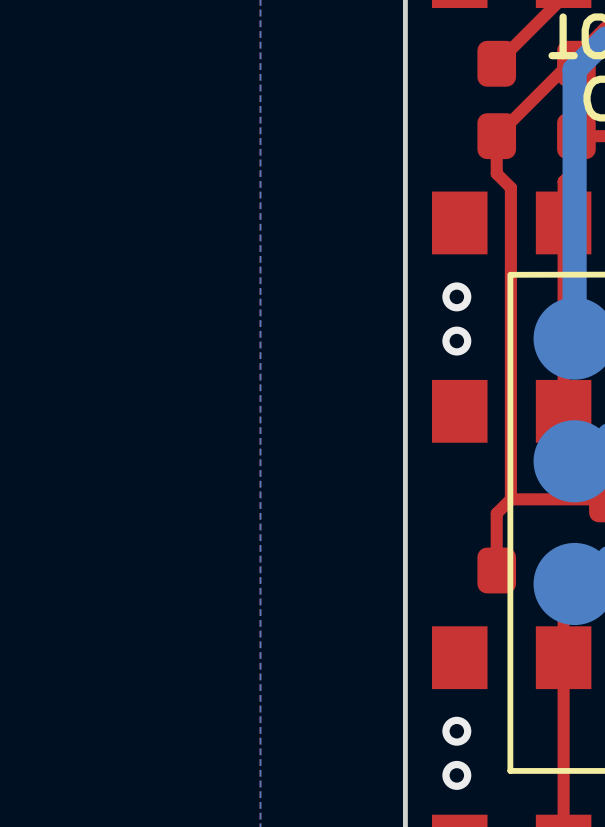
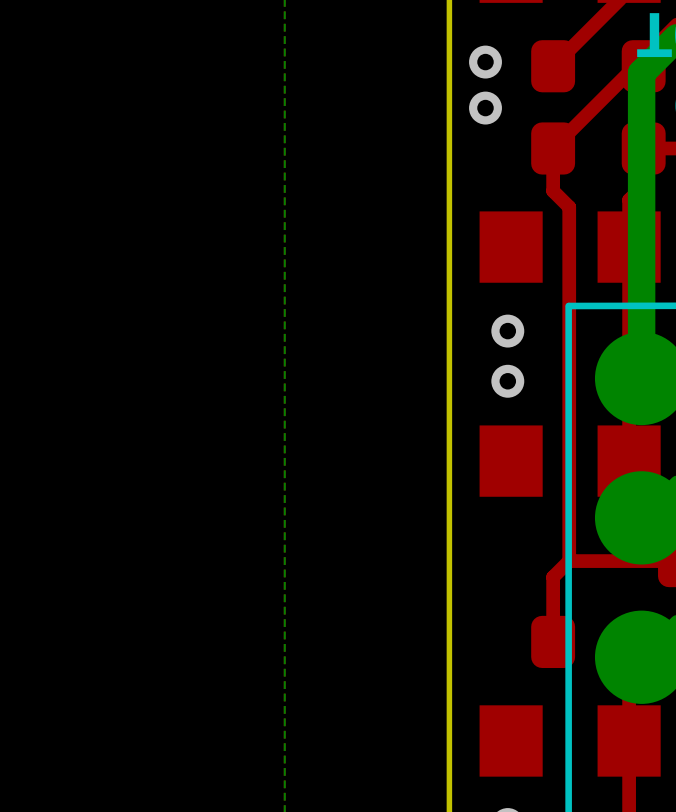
via: none -> (485, 62)
via: none -> (485, 108)

